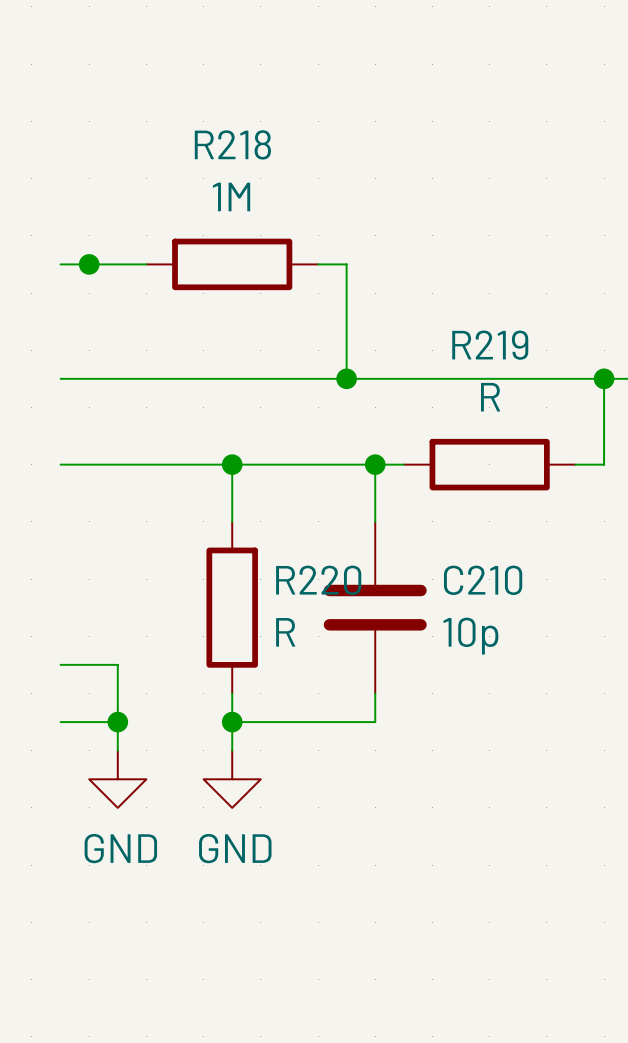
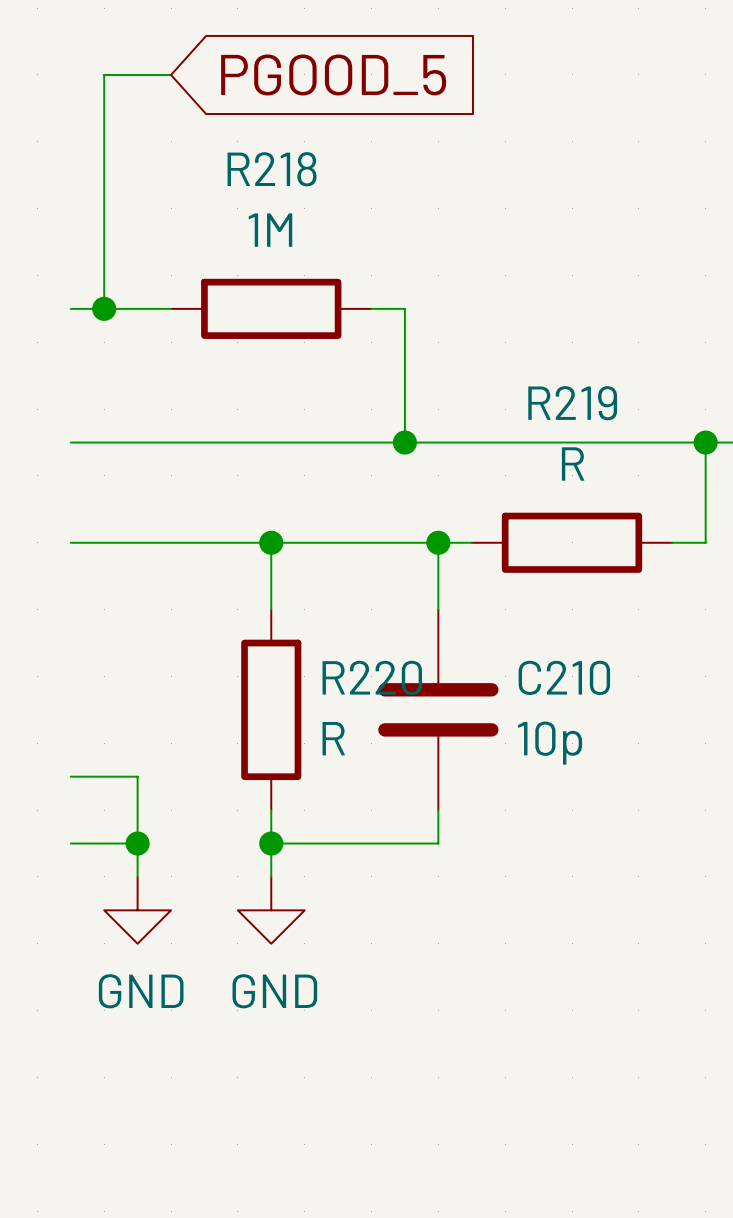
wire: none -> (171, 74) (104, 74) (104, 308)
global label: none -> PGOOD_5 (333, 74)

